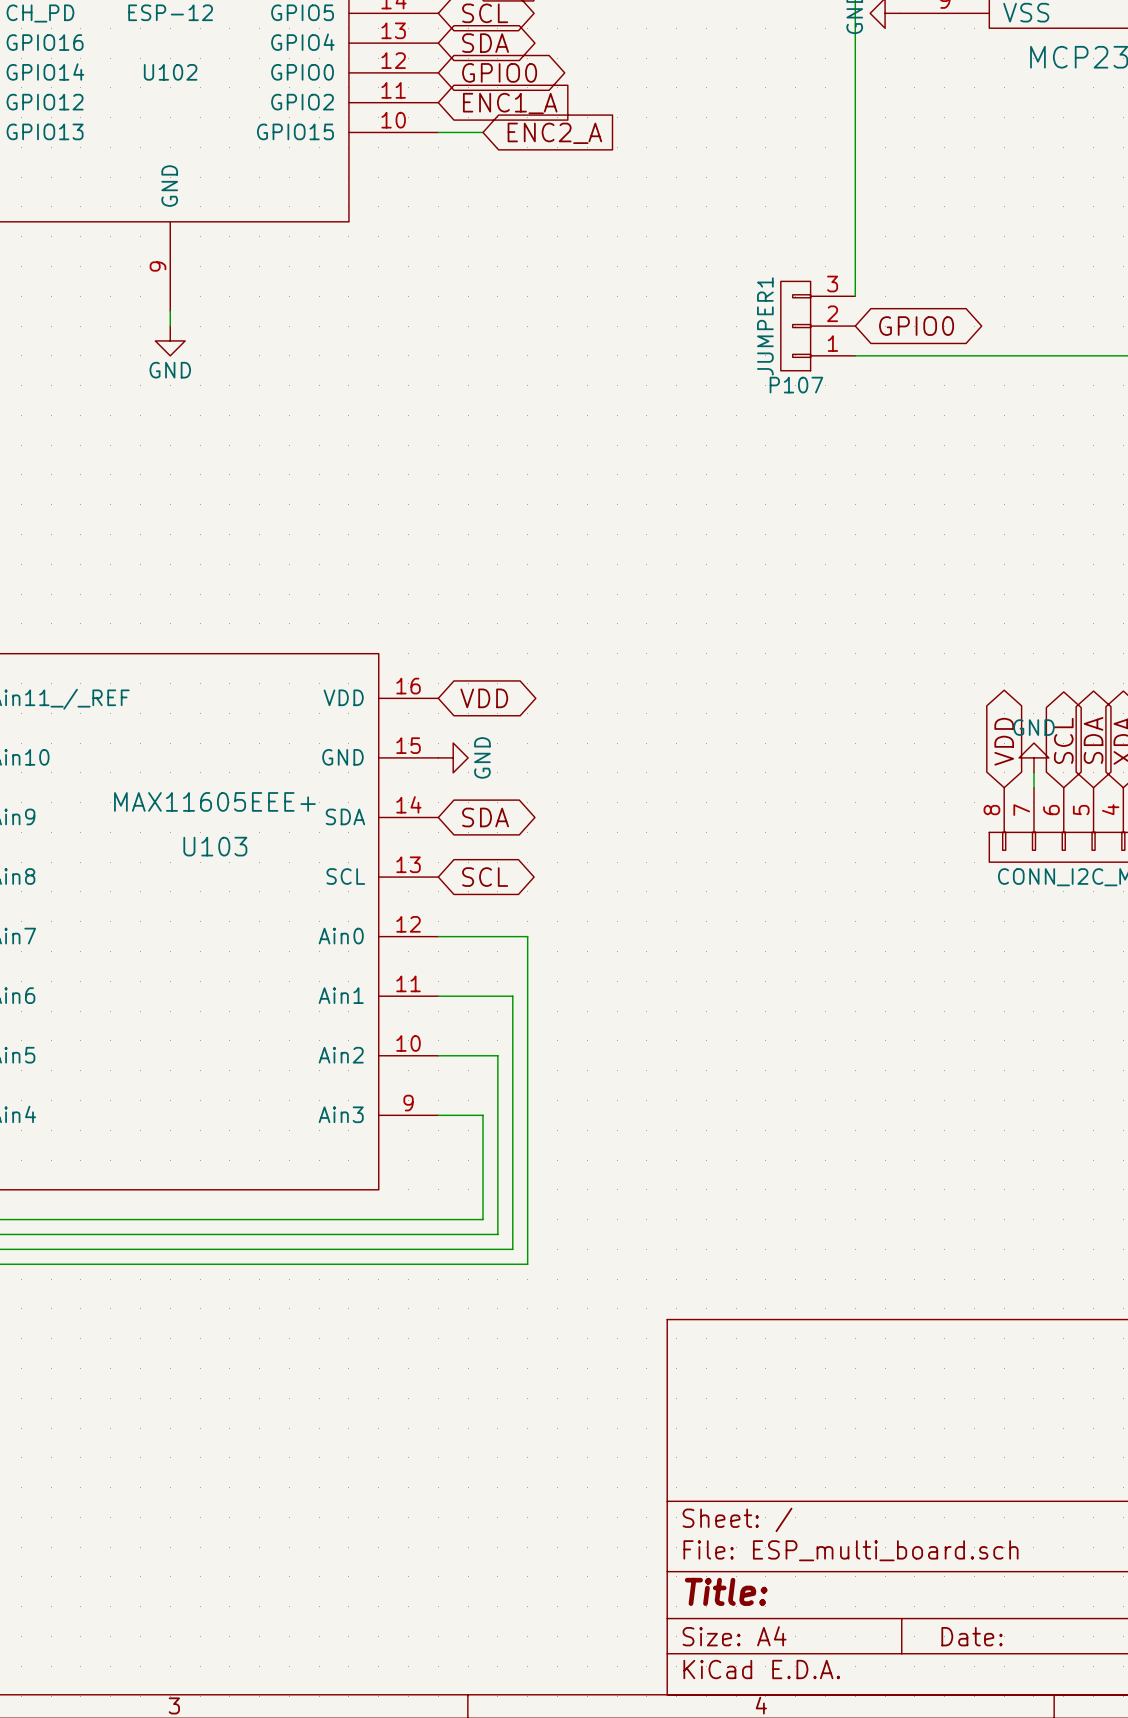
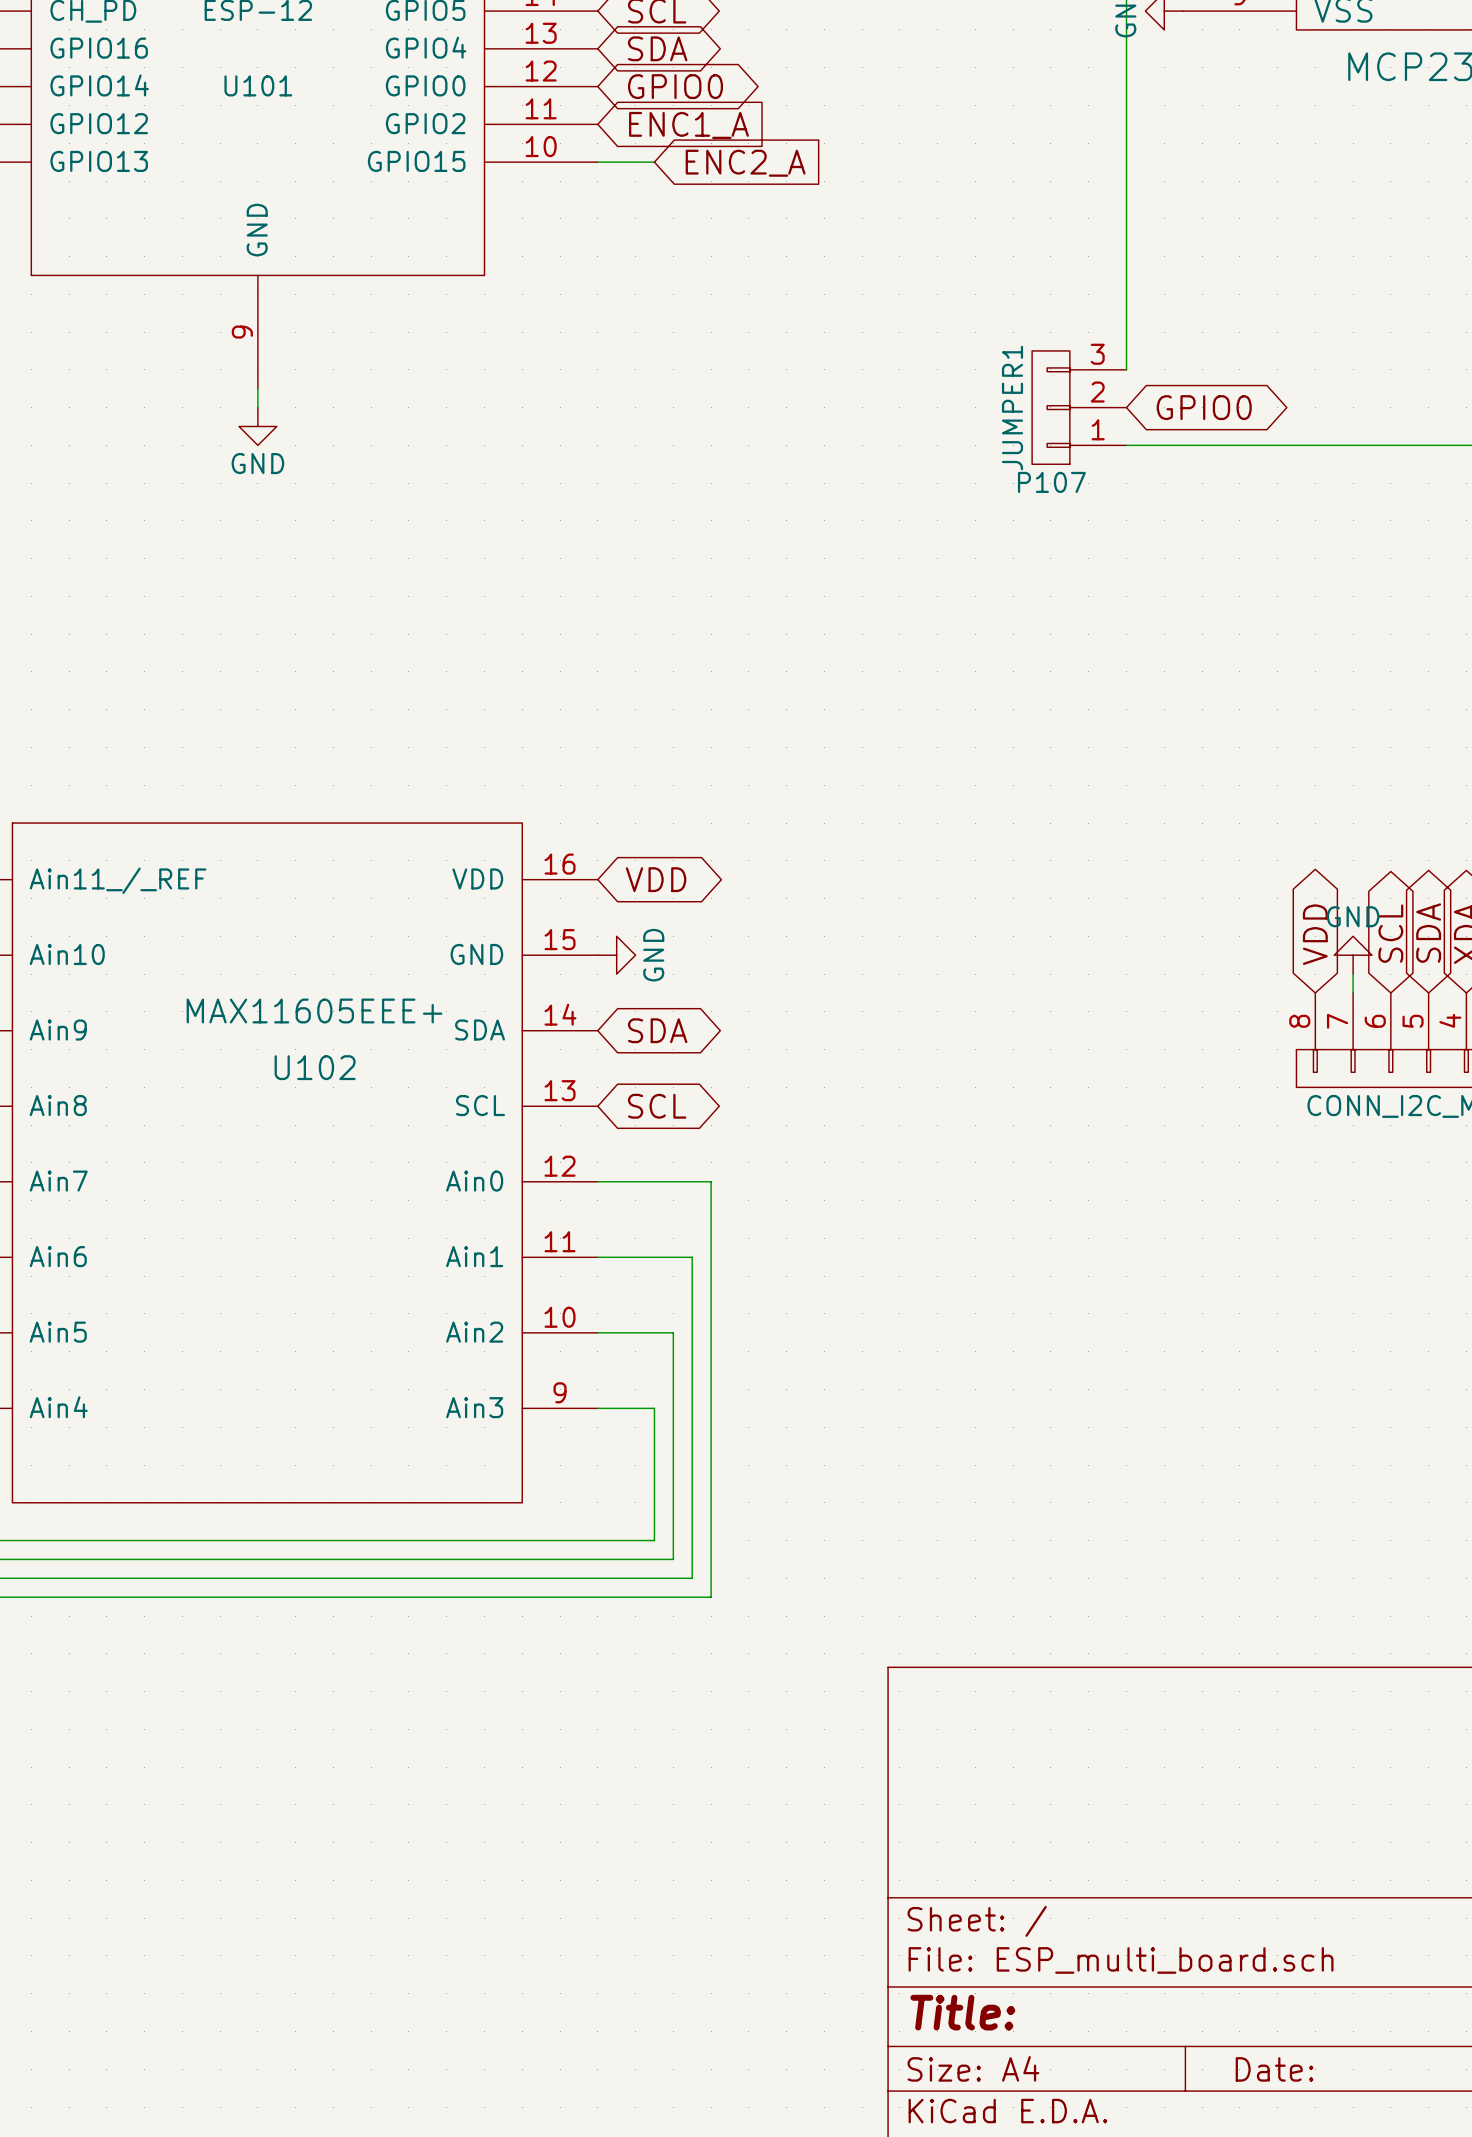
U102 name: U102 (170, 72) -> U101 (258, 85)
U103 name: U103 (215, 846) -> U102 (315, 1067)

